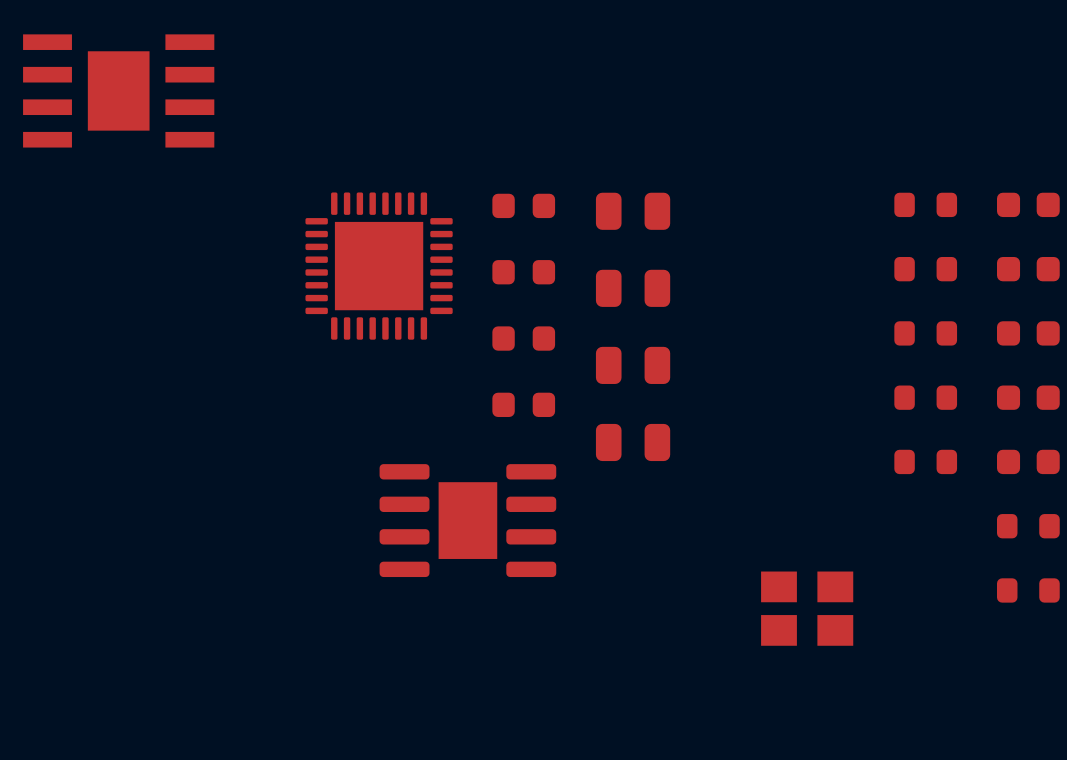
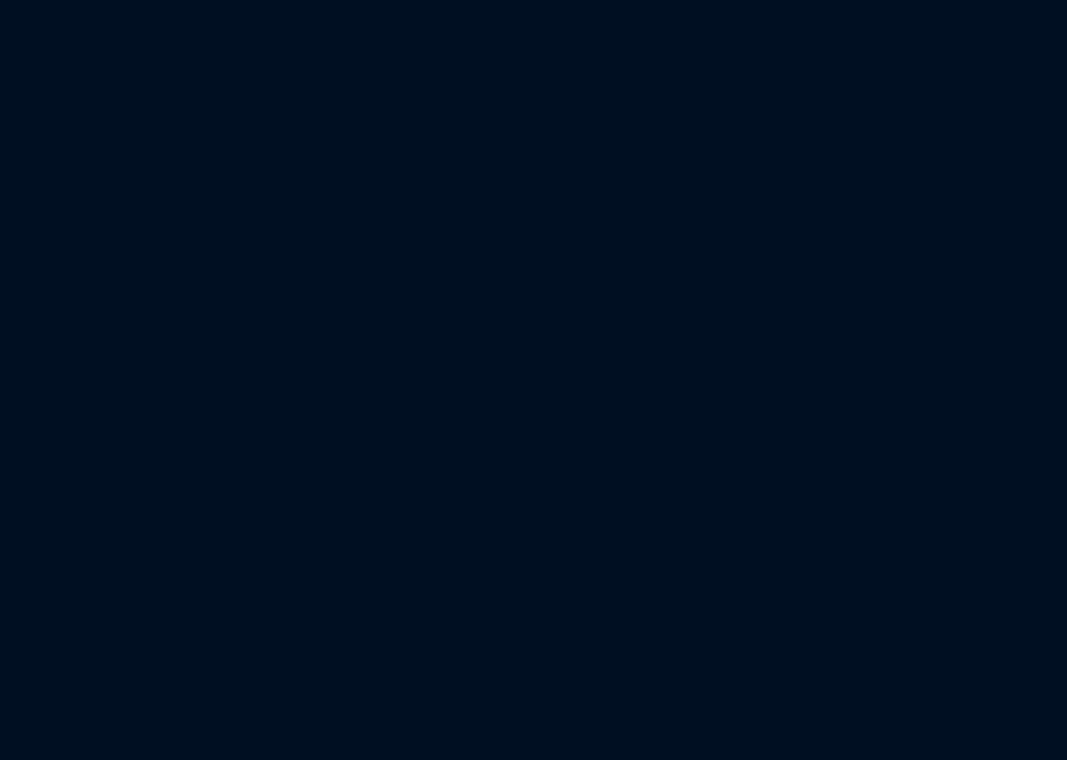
part: (118, 90) -> none
part: (925, 204) -> none
part: (1028, 204) -> none
part: (523, 205) -> none
part: (633, 211) -> none
part: (379, 266) -> none
part: (925, 269) -> none
part: (1028, 269) -> none
part: (523, 272) -> none
part: (633, 288) -> none
part: (925, 333) -> none
part: (1028, 333) -> none
part: (523, 338) -> none
part: (633, 365) -> none
part: (925, 397) -> none
part: (1028, 397) -> none
part: (523, 404) -> none
part: (633, 442) -> none
part: (925, 461) -> none
part: (1028, 461) -> none
part: (467, 520) -> none
part: (1028, 526) -> none
part: (1028, 590) -> none
part: (807, 608) -> none

